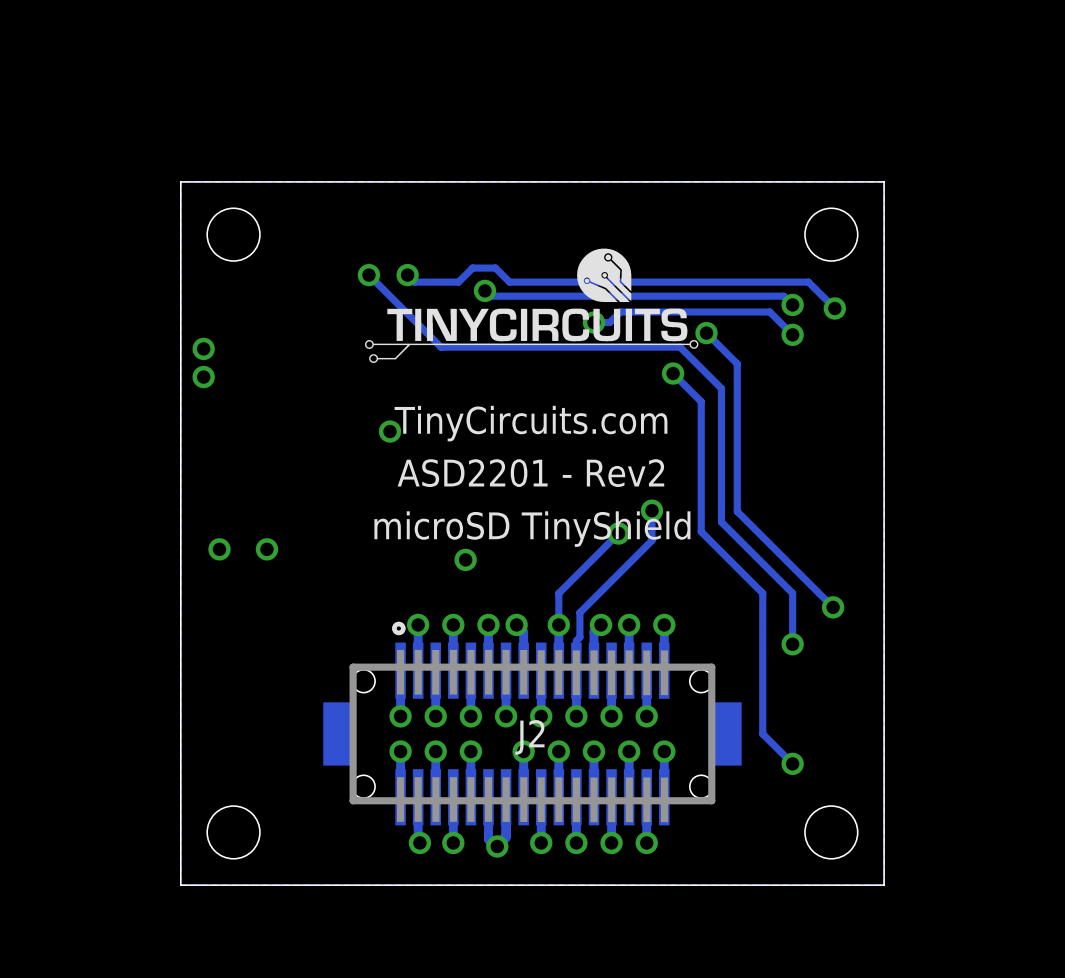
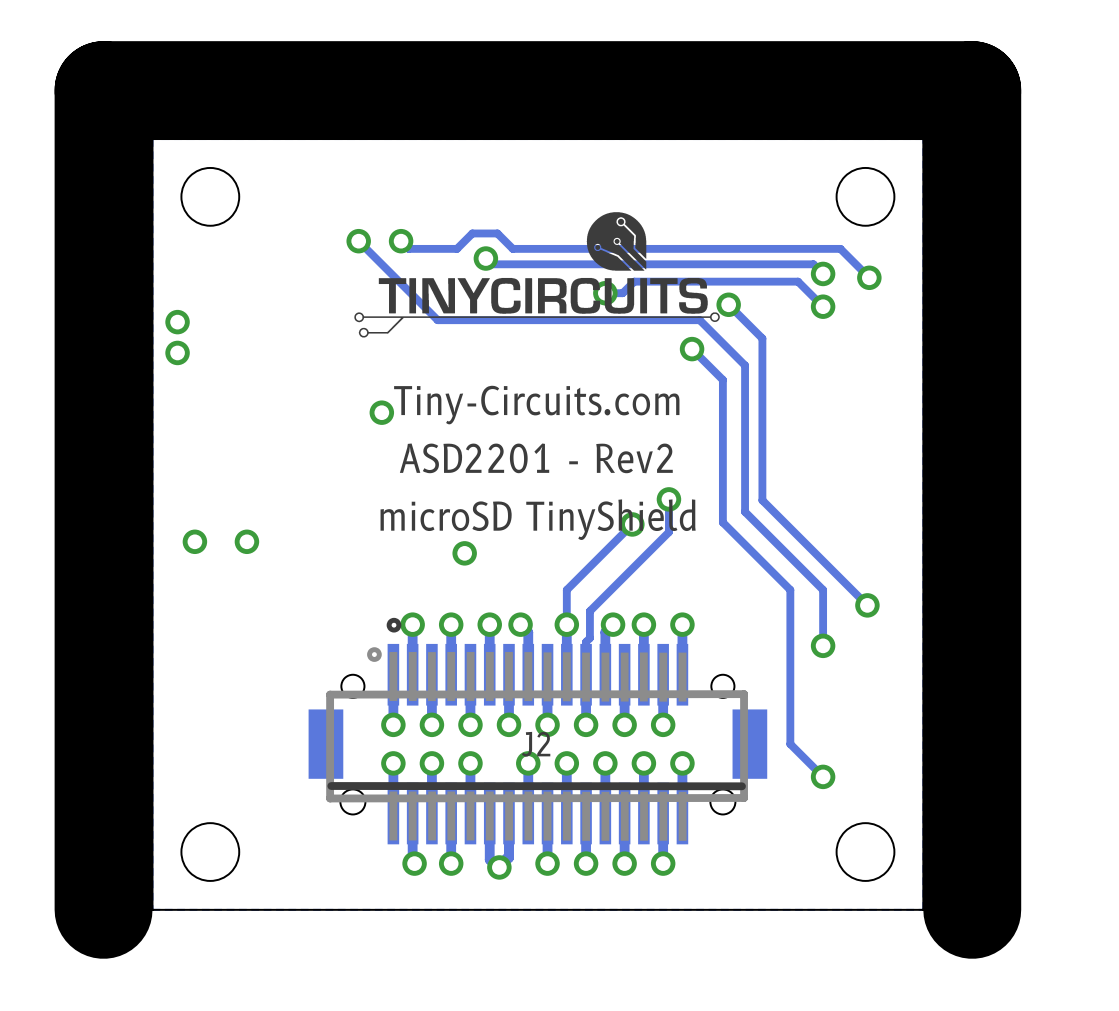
text: TinyCircuits.com (530, 423) -> Tiny-Circuits.com (536, 405)
J2 footprint: [323, 621, 742, 826] -> [308, 617, 768, 845]
board edge: none -> (972, 909) (972, 90) (103, 90) (103, 909)

